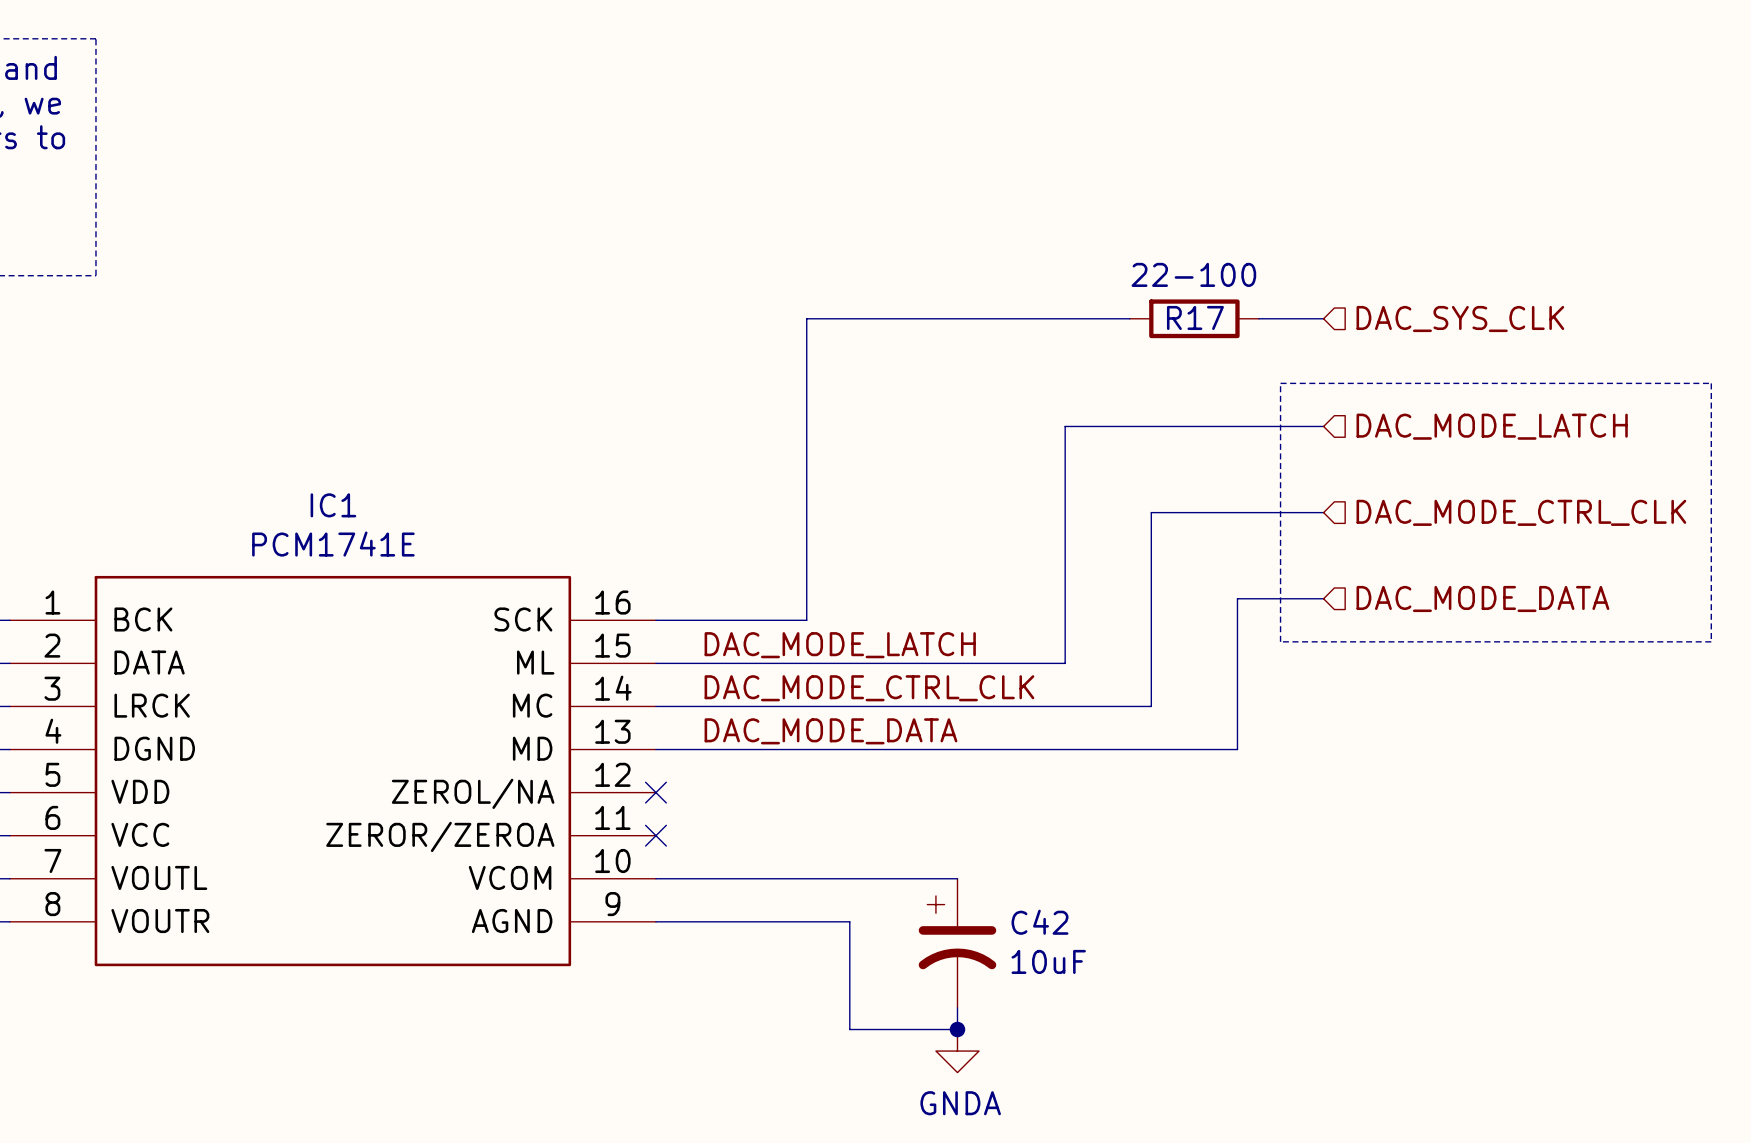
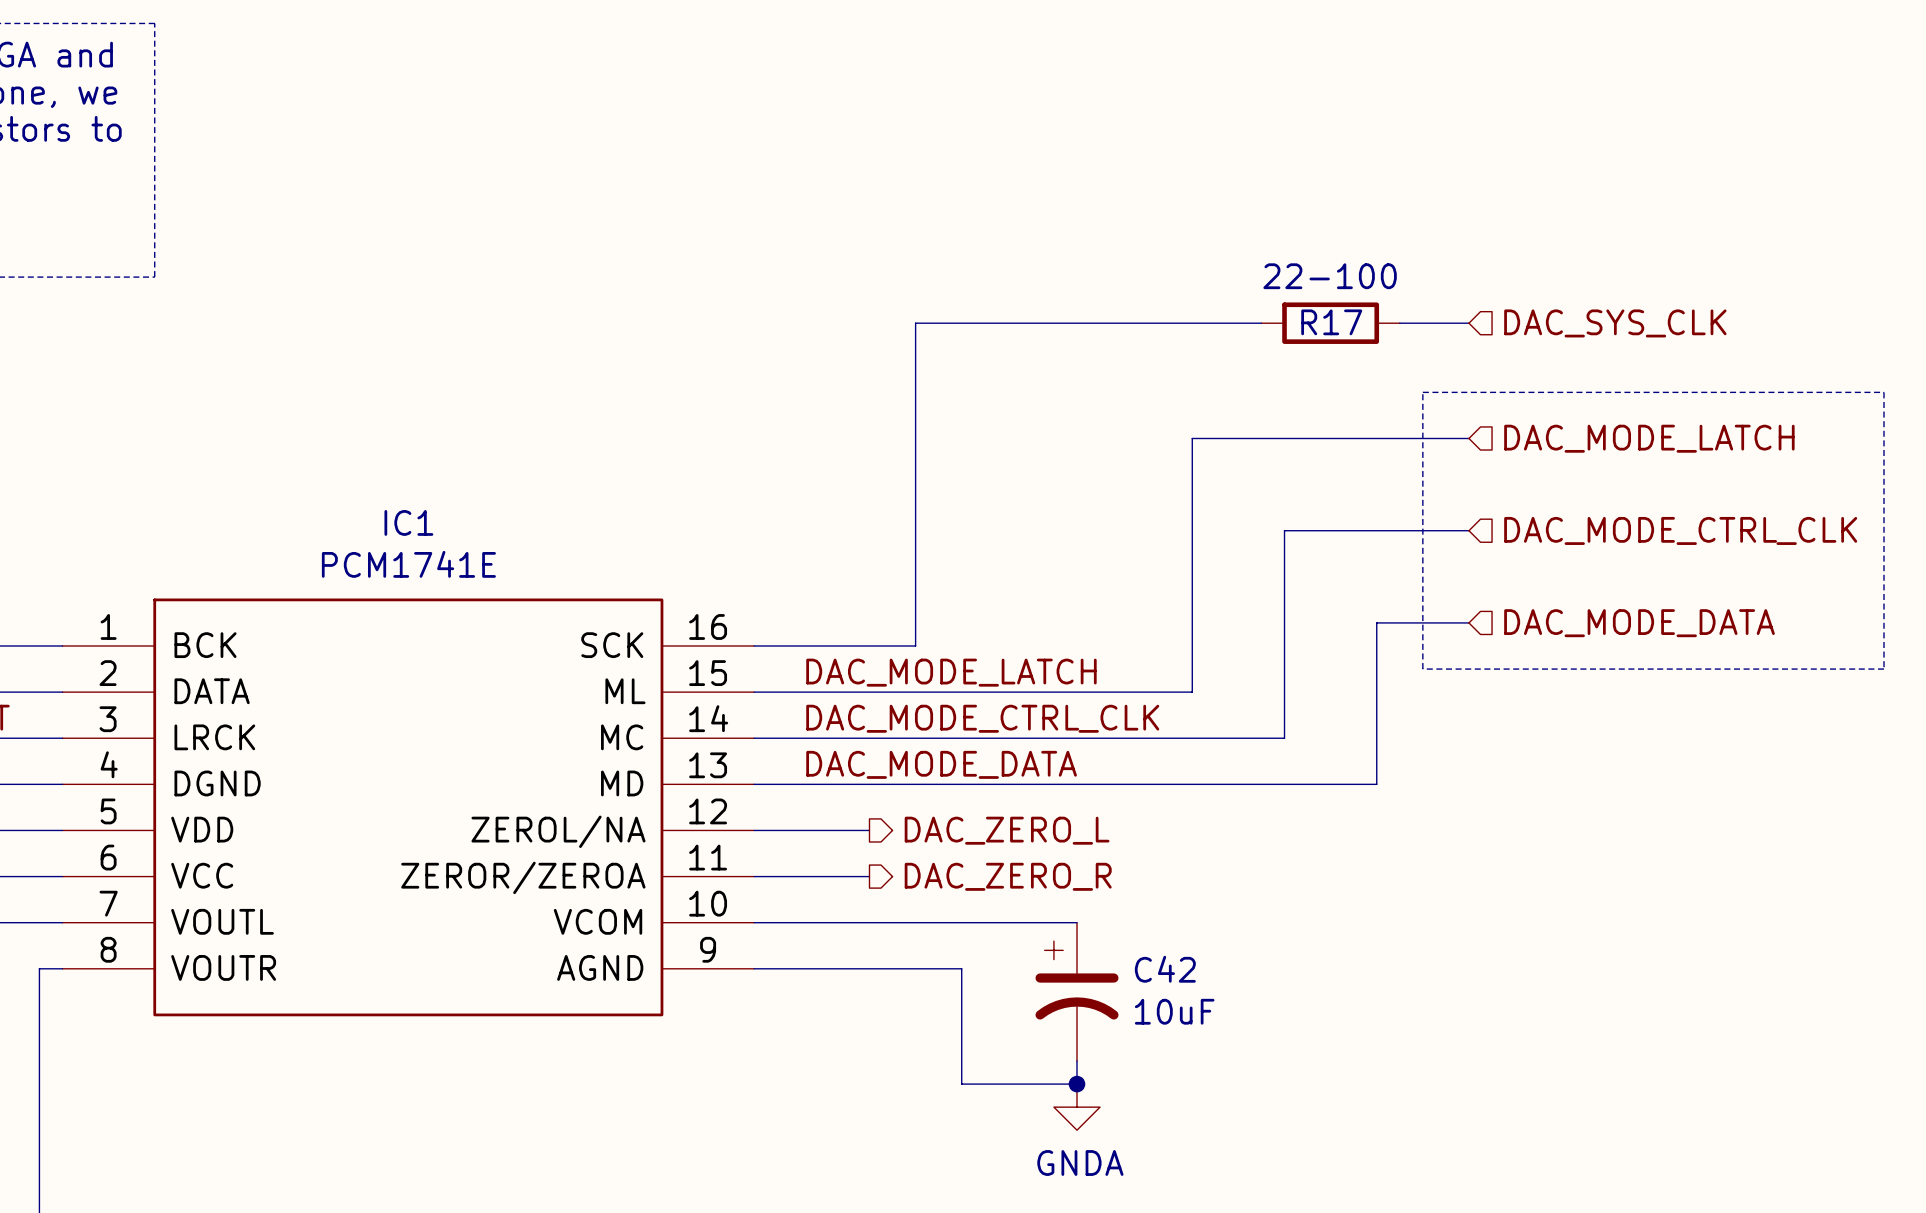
wire: none -> (754, 830) (869, 830)
no-connect mark: (655, 792) -> none
hierarchical label: none -> DAC_ZERO_L (1007, 830)
wire: none -> (754, 876) (869, 876)
no-connect mark: (655, 835) -> none
hierarchical label: none -> DAC_ZERO_R (1008, 876)

